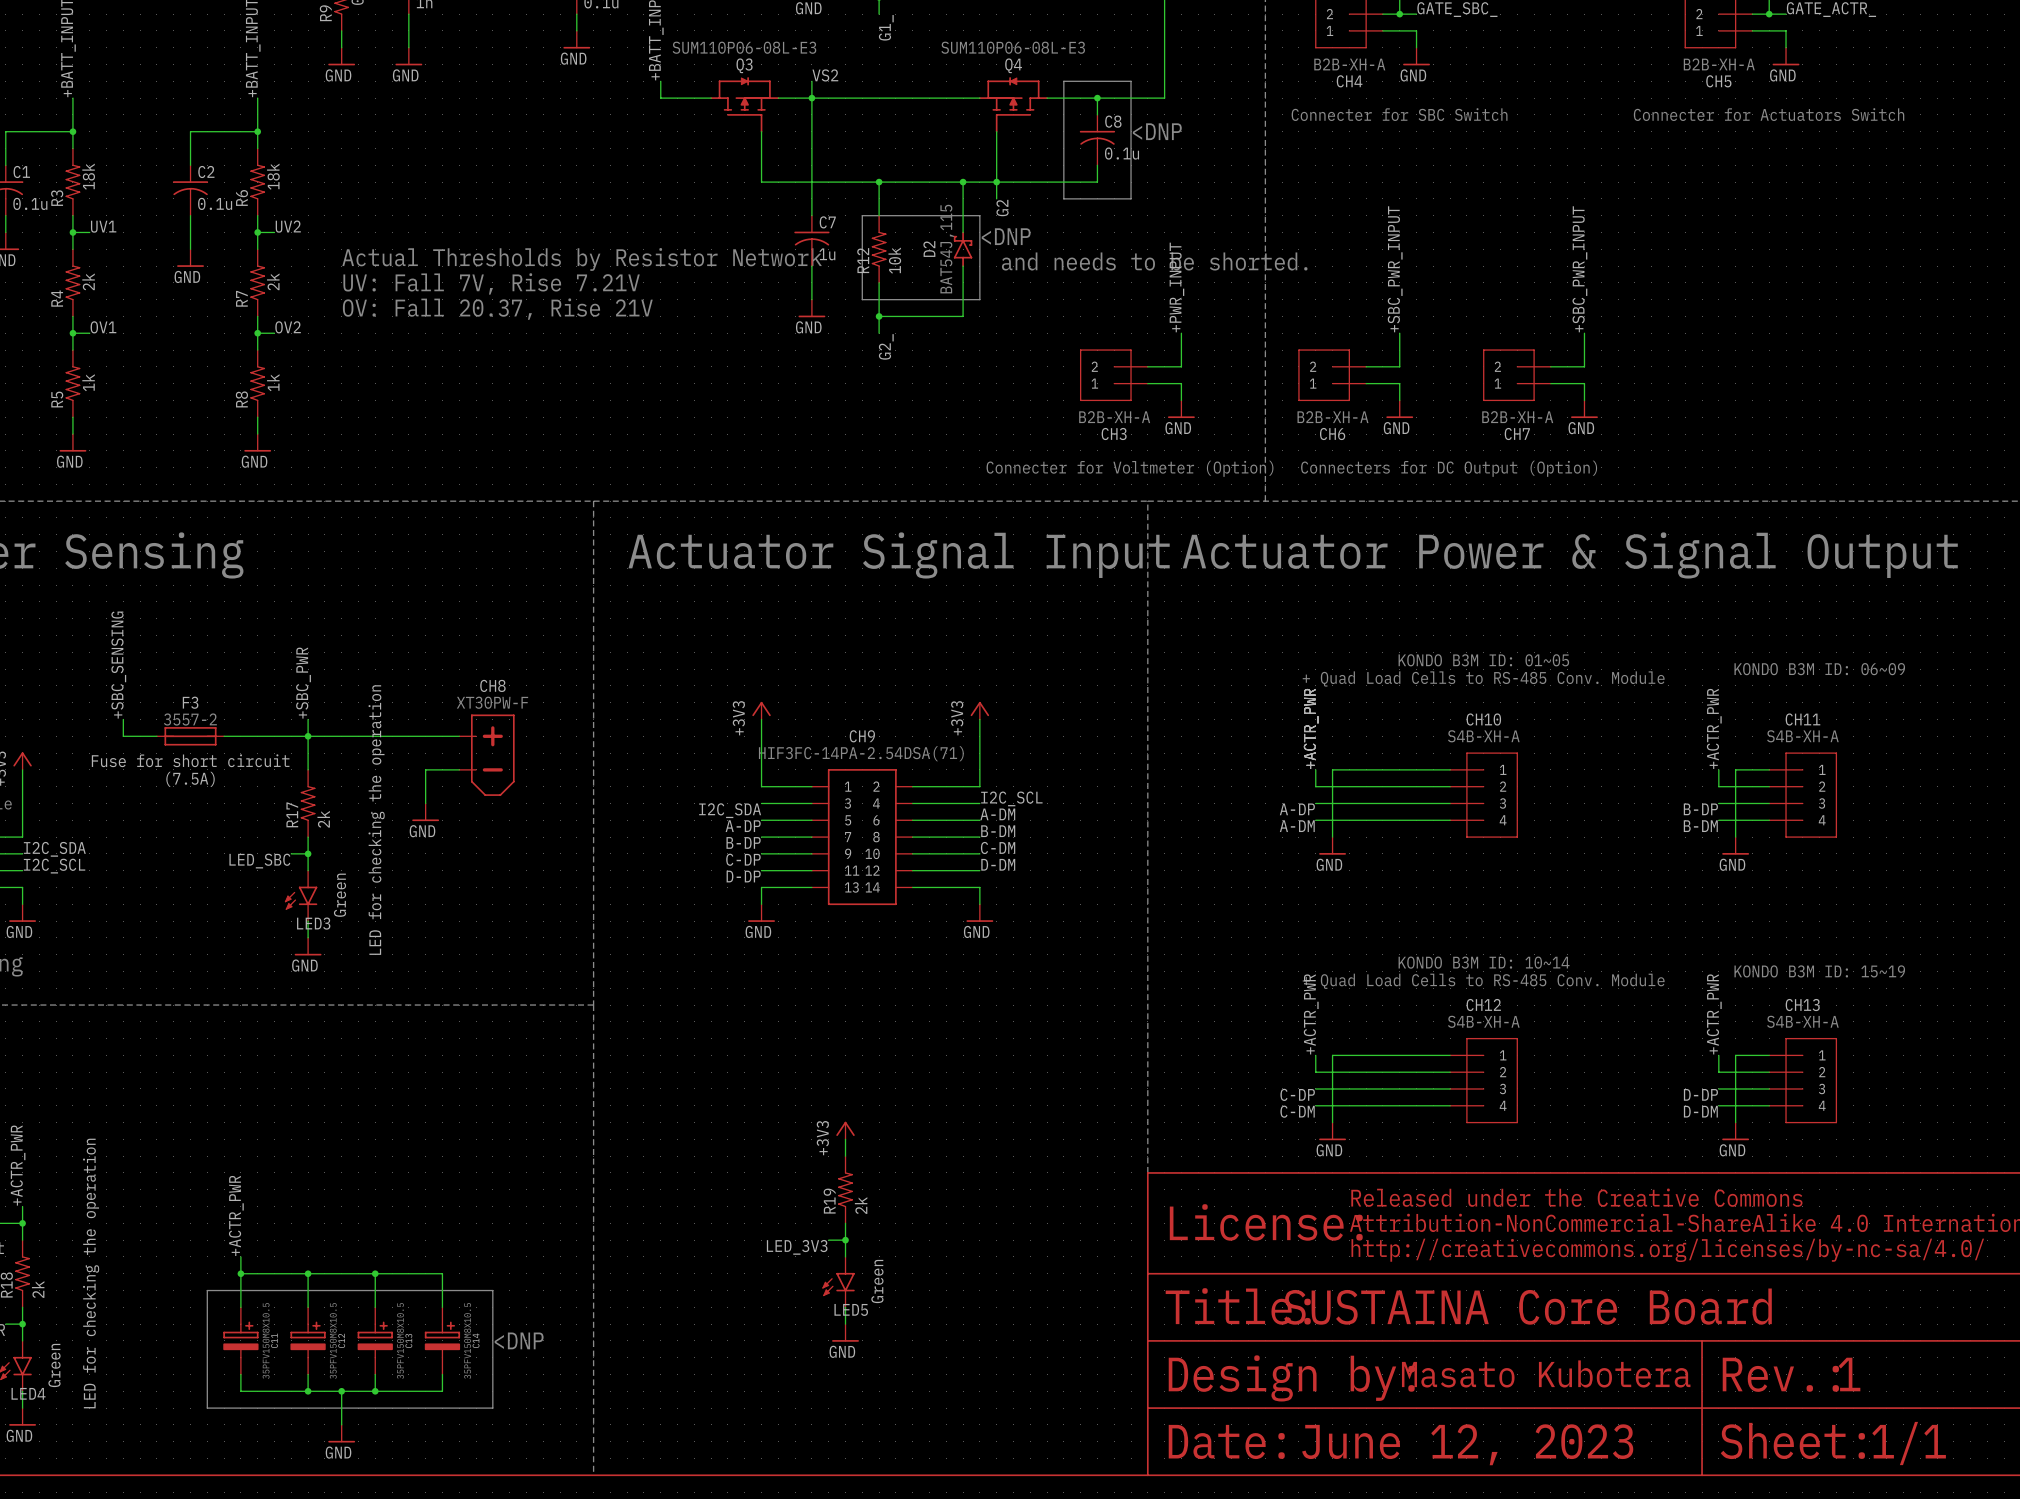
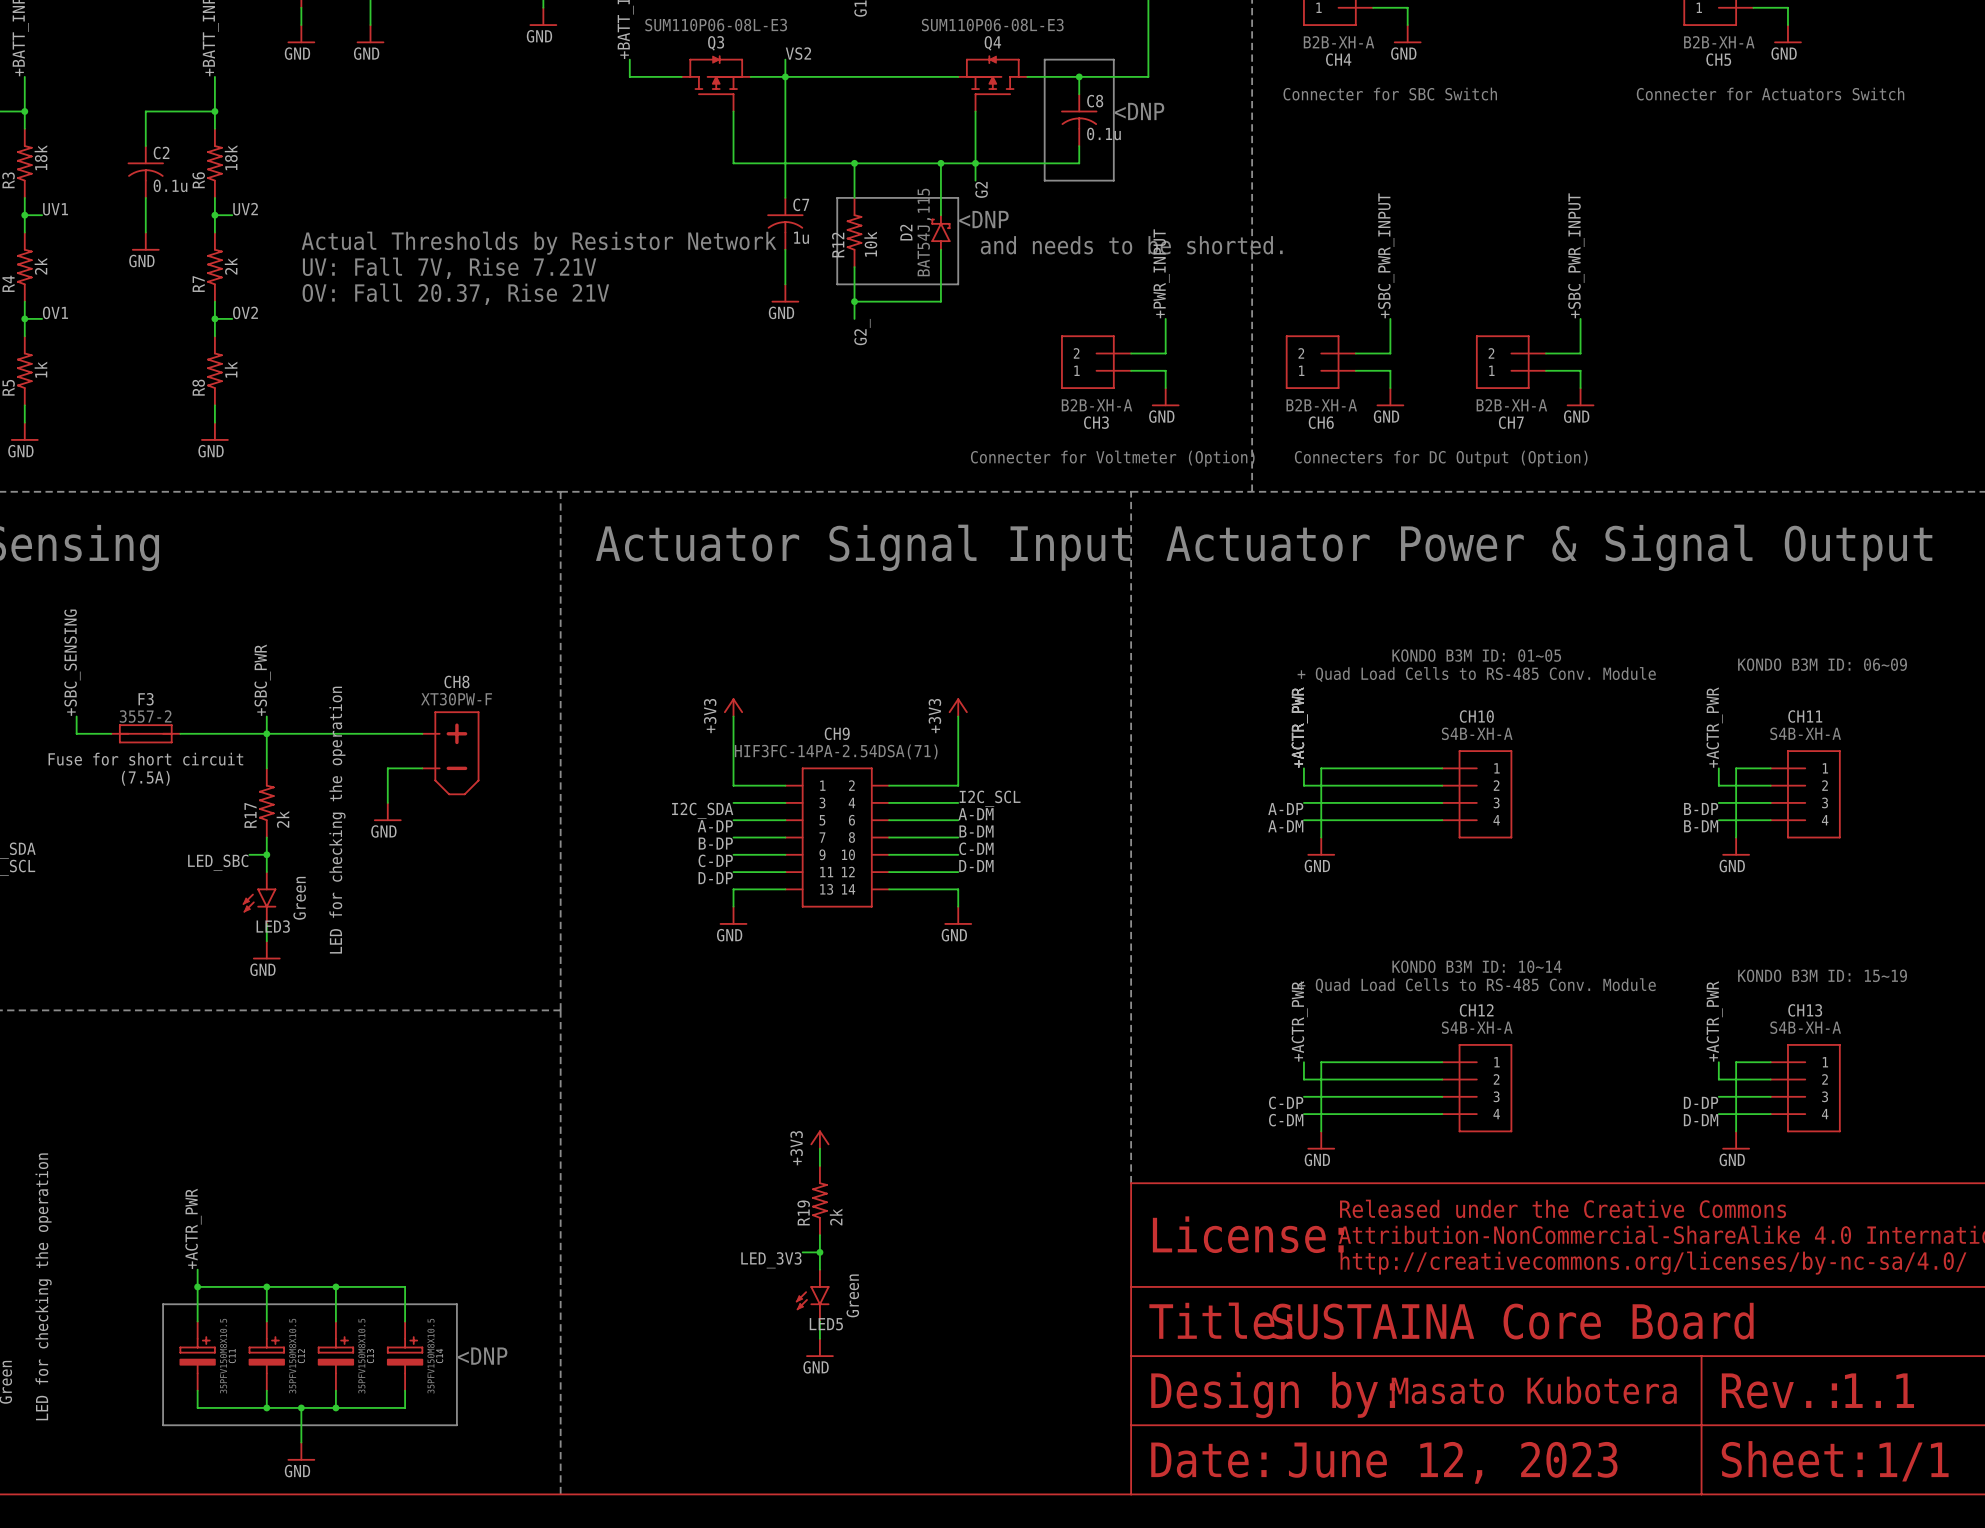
text: 1 (1849, 1374) -> 1.1 (1879, 1390)

